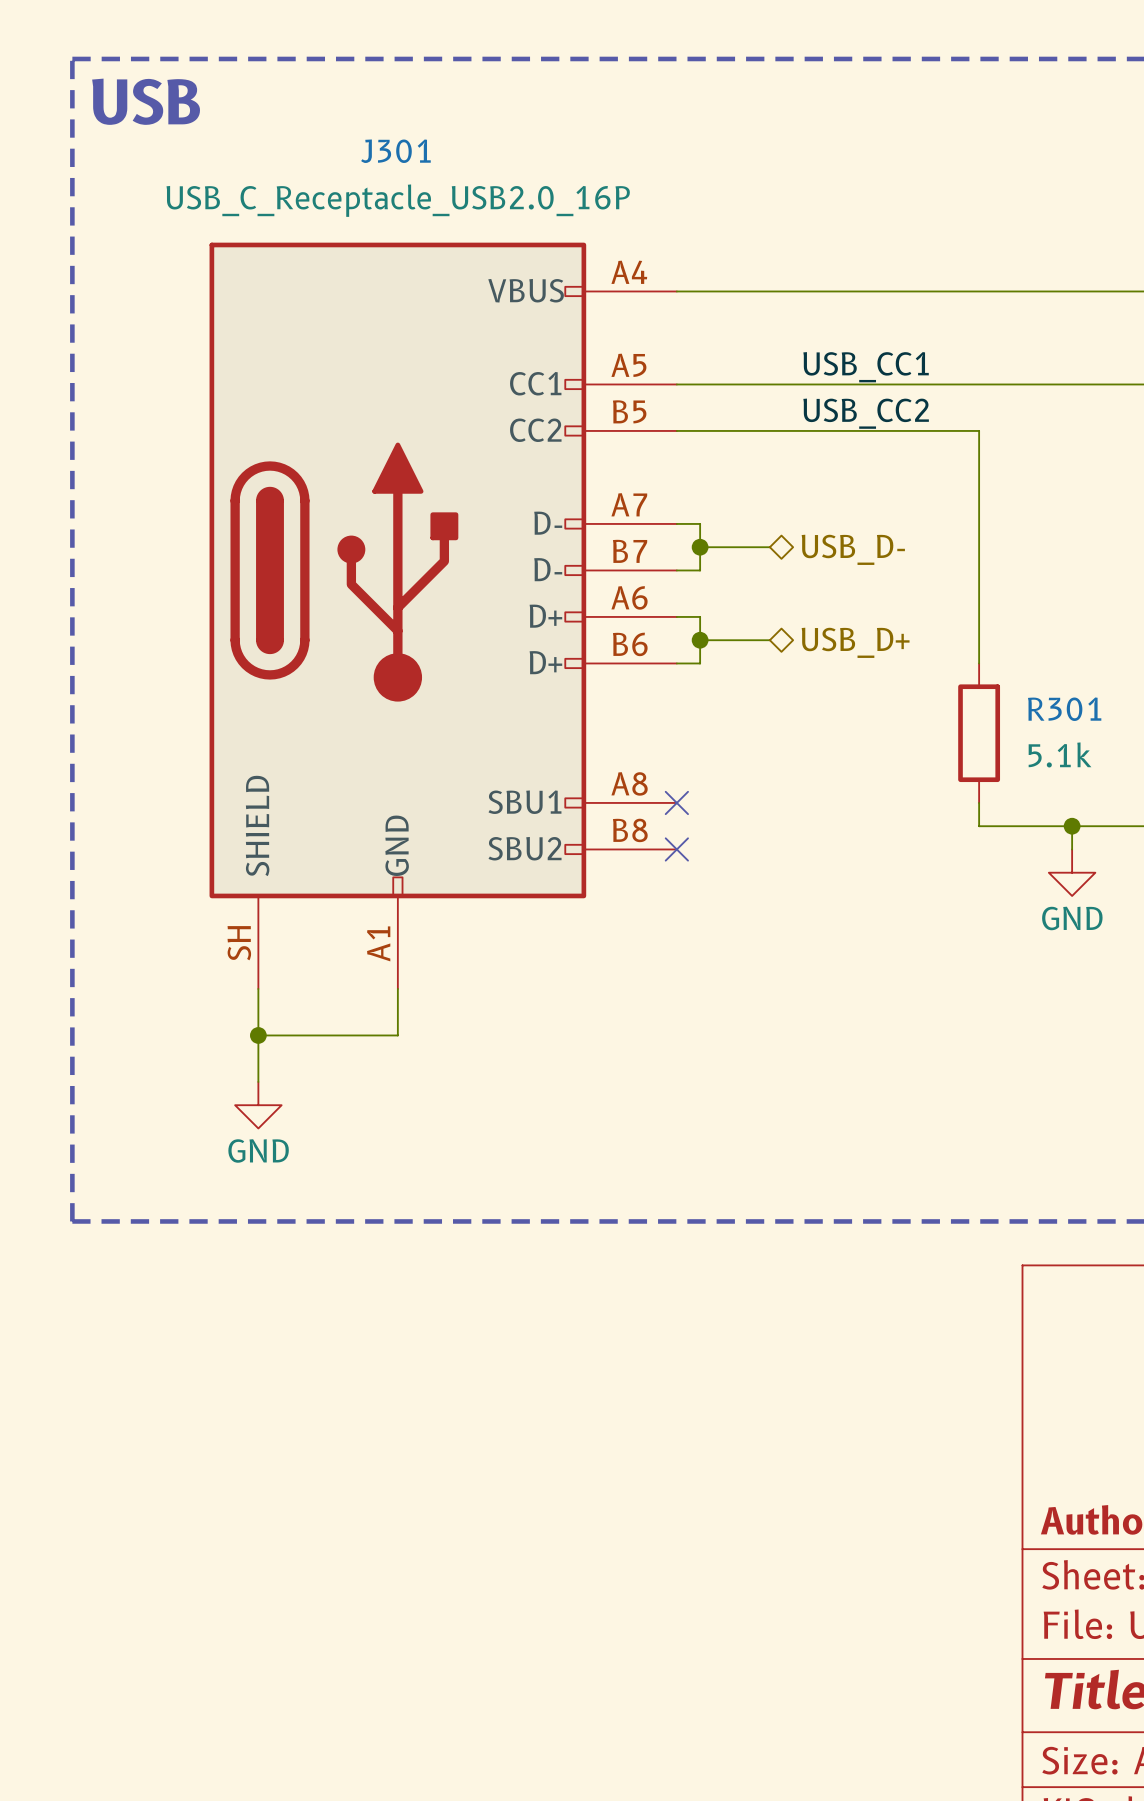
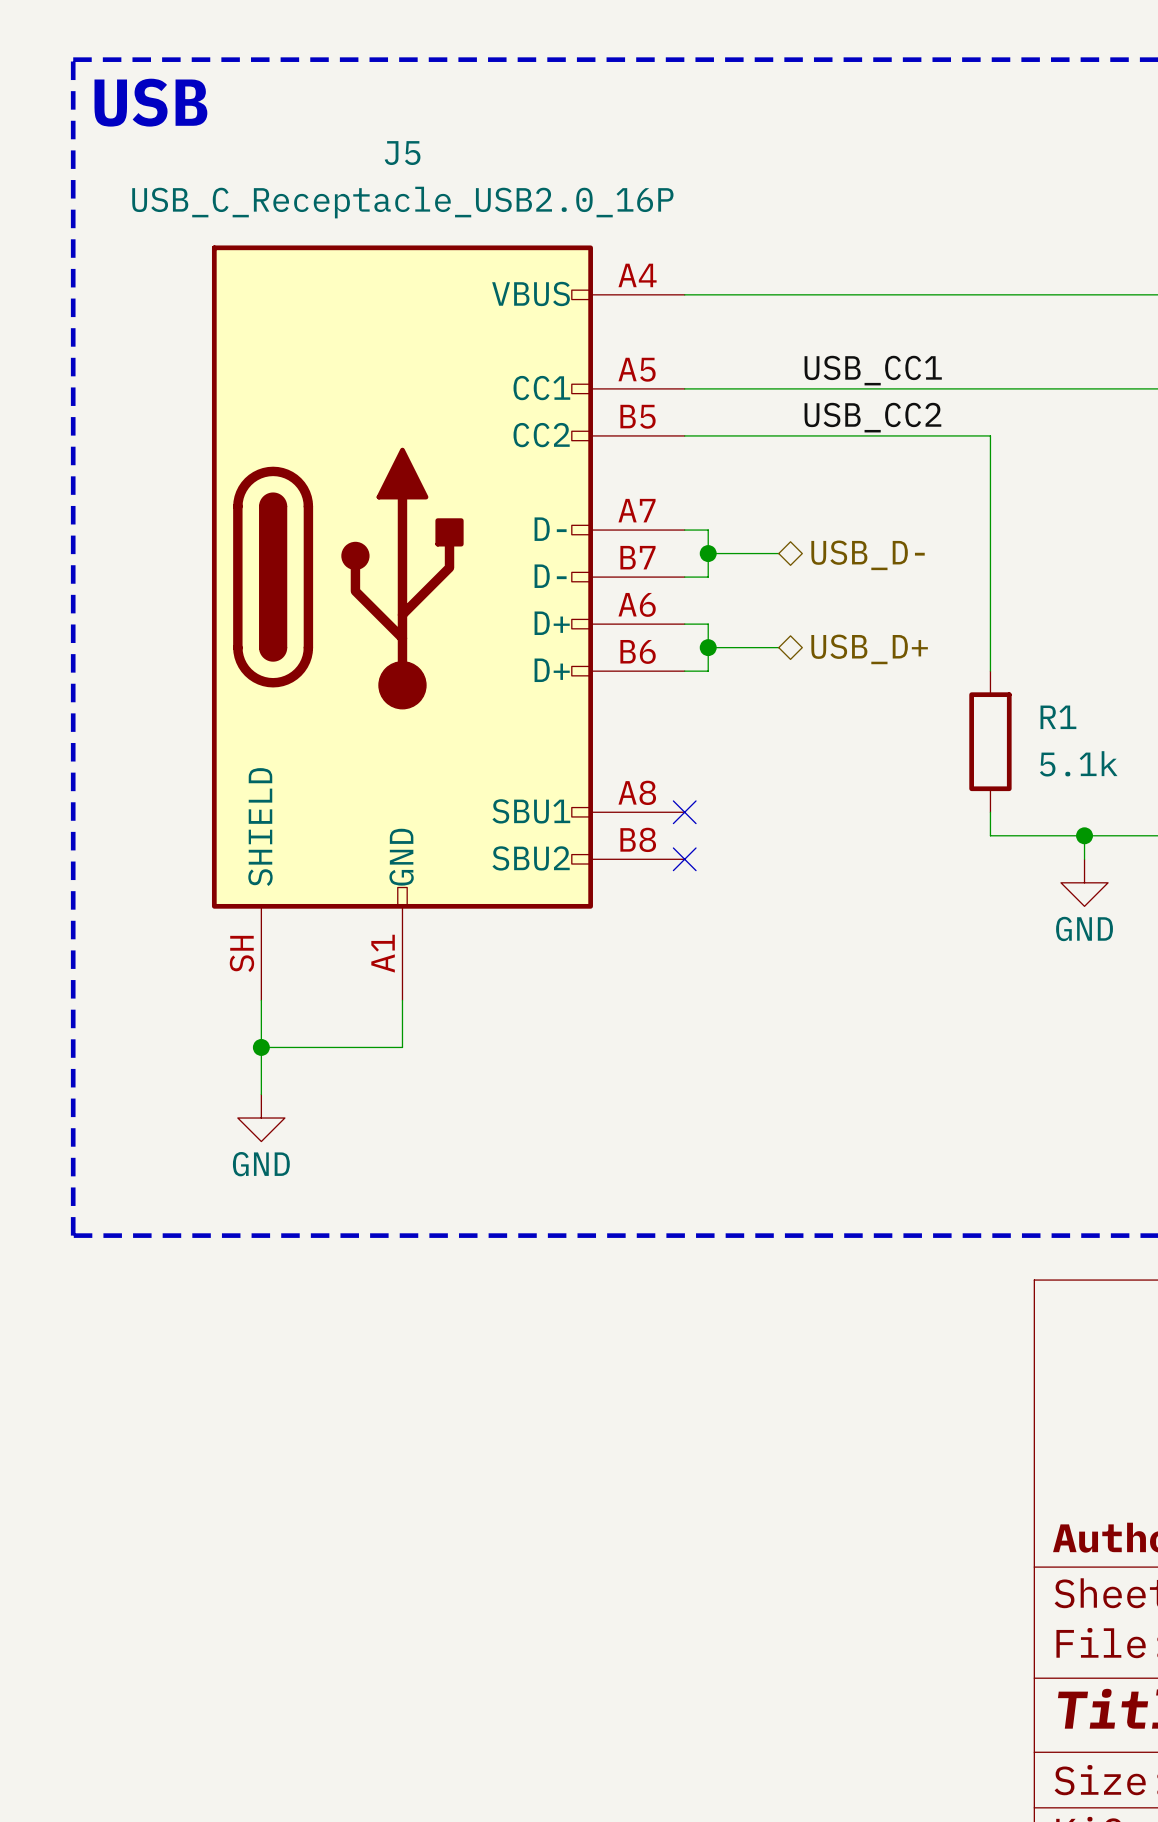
J301 name: J301 (395, 151) -> J5 (402, 153)
R301 name: R301 (1064, 709) -> R1 (1058, 717)

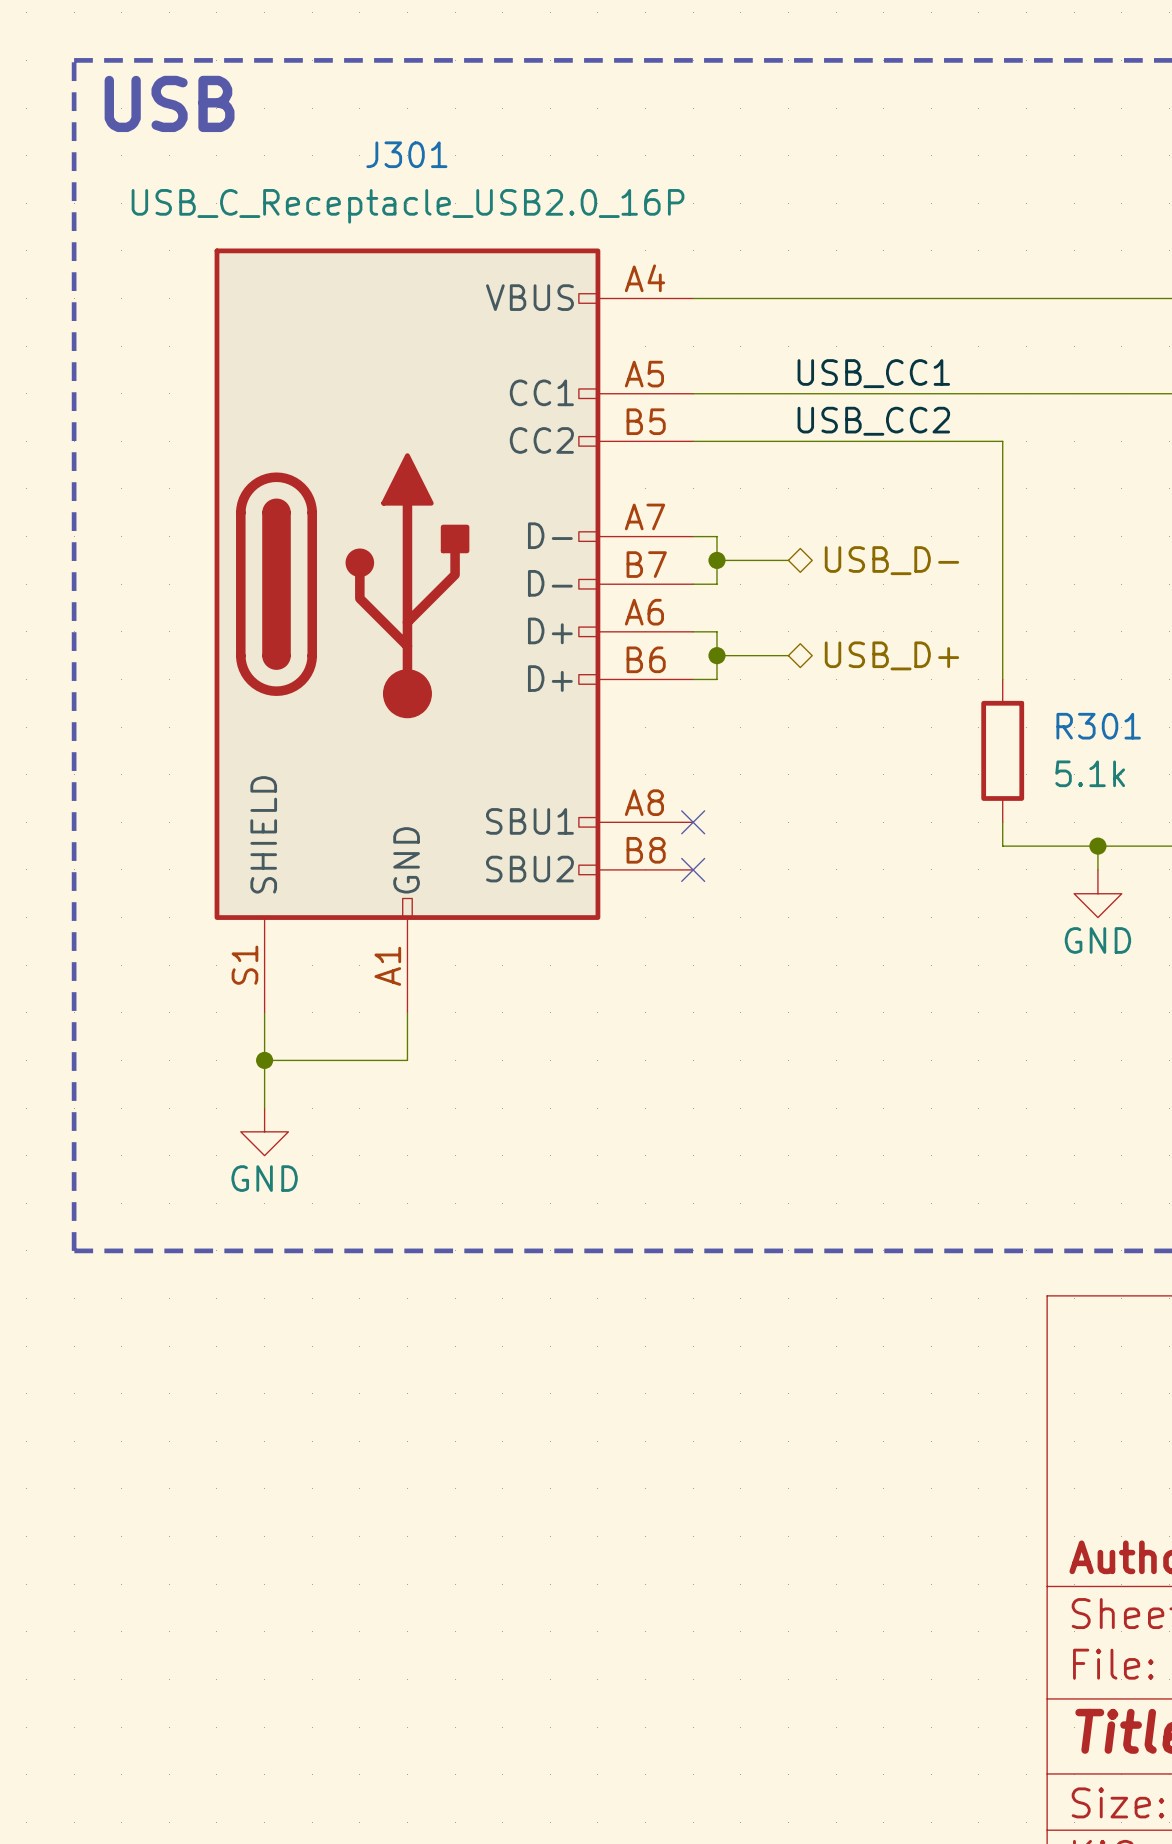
J5 name: J5 (402, 153) -> J301 (406, 154)
R1 name: R1 (1058, 717) -> R301 (1098, 726)
J5 pin number: SH (241, 953) -> S1 (244, 965)

